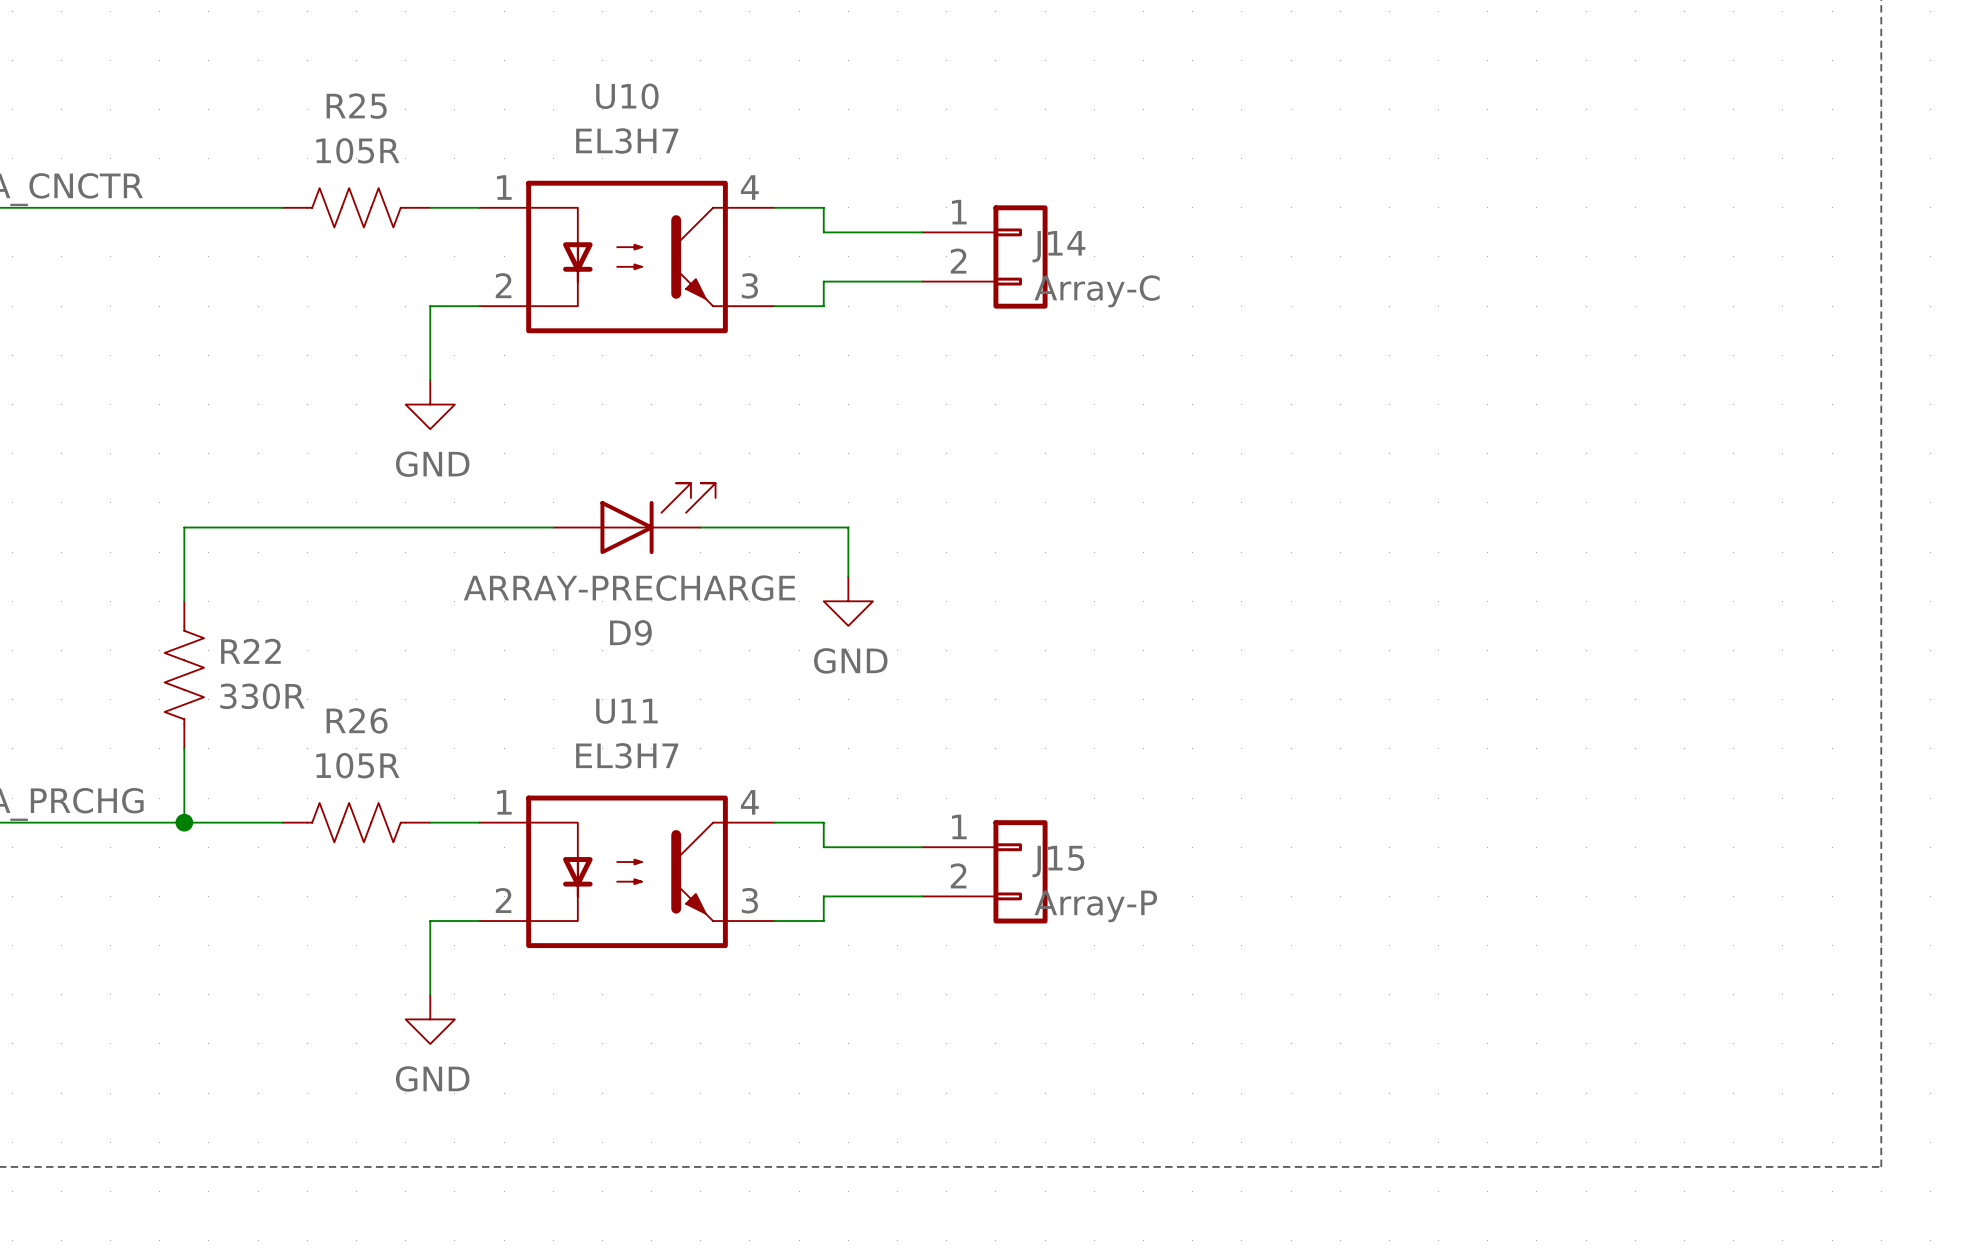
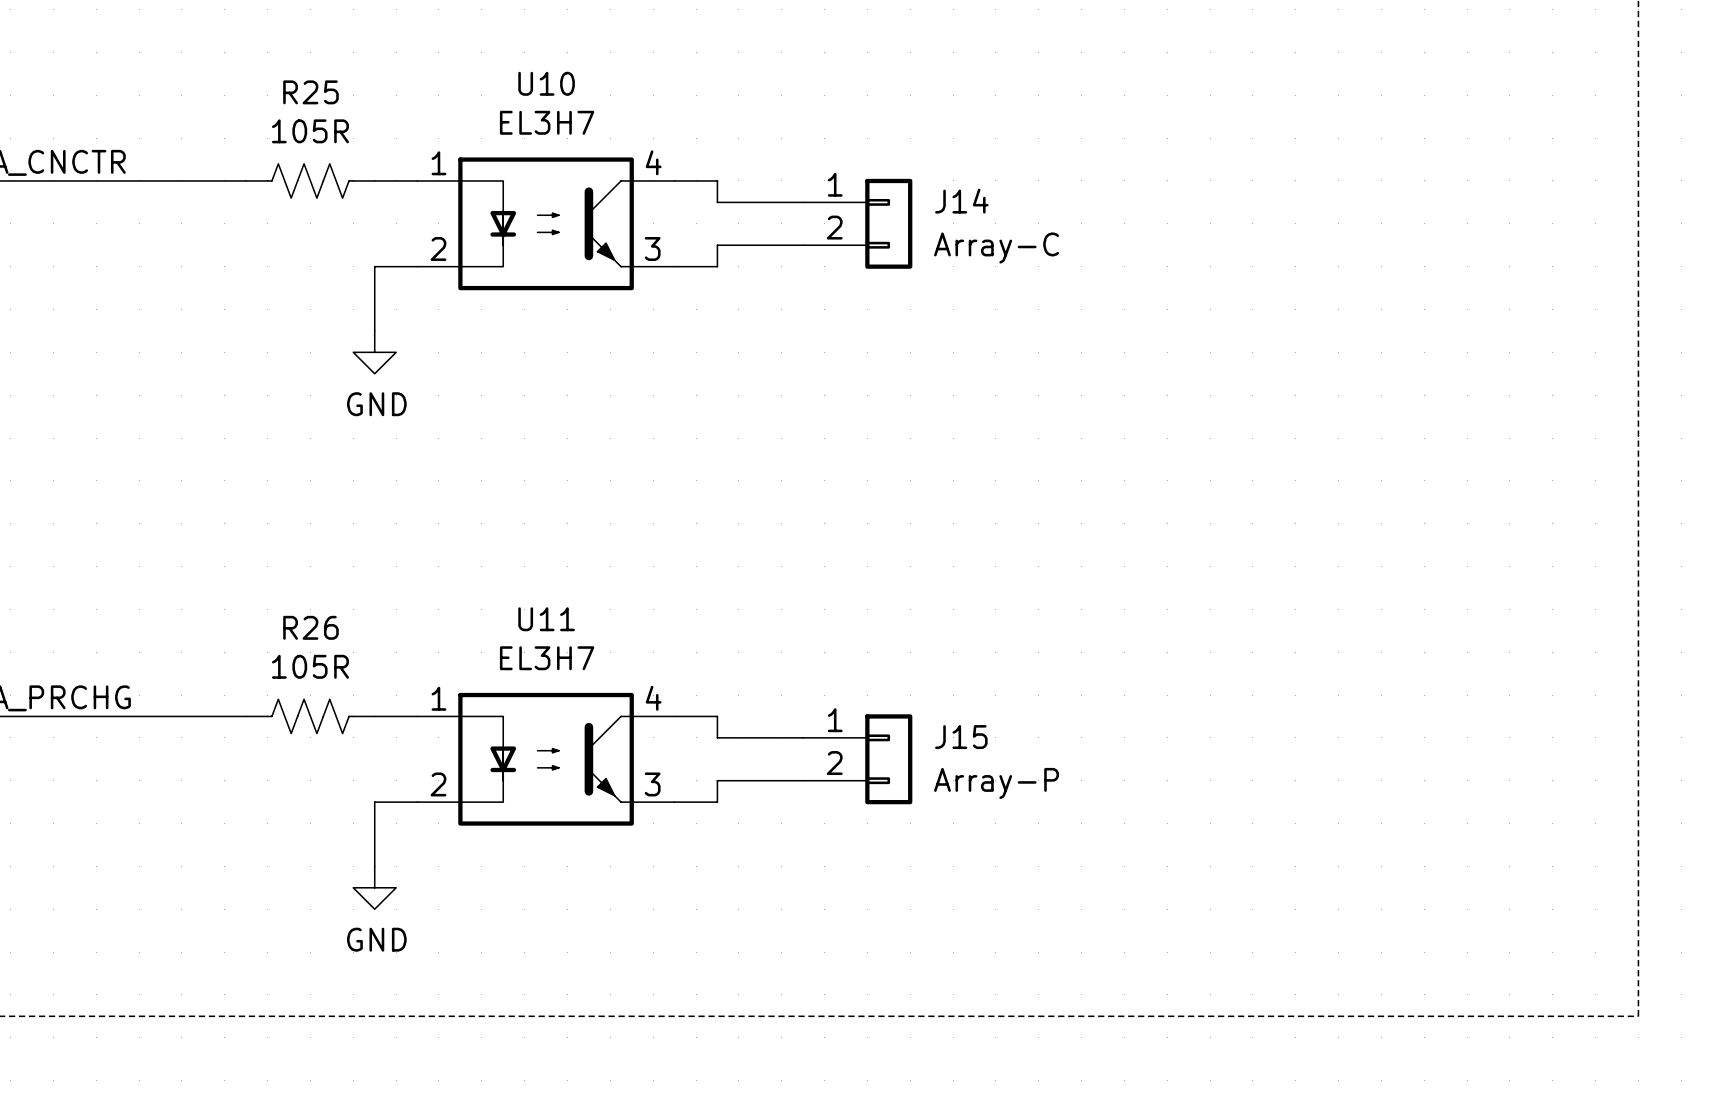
J14 name position: J14 (1058, 246) -> J14 (961, 201)
J14 value position: Array-C (1097, 291) -> Array-C (996, 248)
D9: ARRAY-PRECHARGE (634, 518) -> none
wire: (553, 527) (184, 527) (184, 601) -> none
wire: (700, 527) (848, 527) (848, 576) -> none
power symbol: GND (848, 601) -> none
R22: 330R (184, 675) -> none
wire: (184, 748) (184, 822) -> none
junction: (184, 822) -> none
J15 name position: J15 (1058, 861) -> J15 (961, 737)
J15 value position: Array-P (1095, 906) -> Array-P (996, 783)

